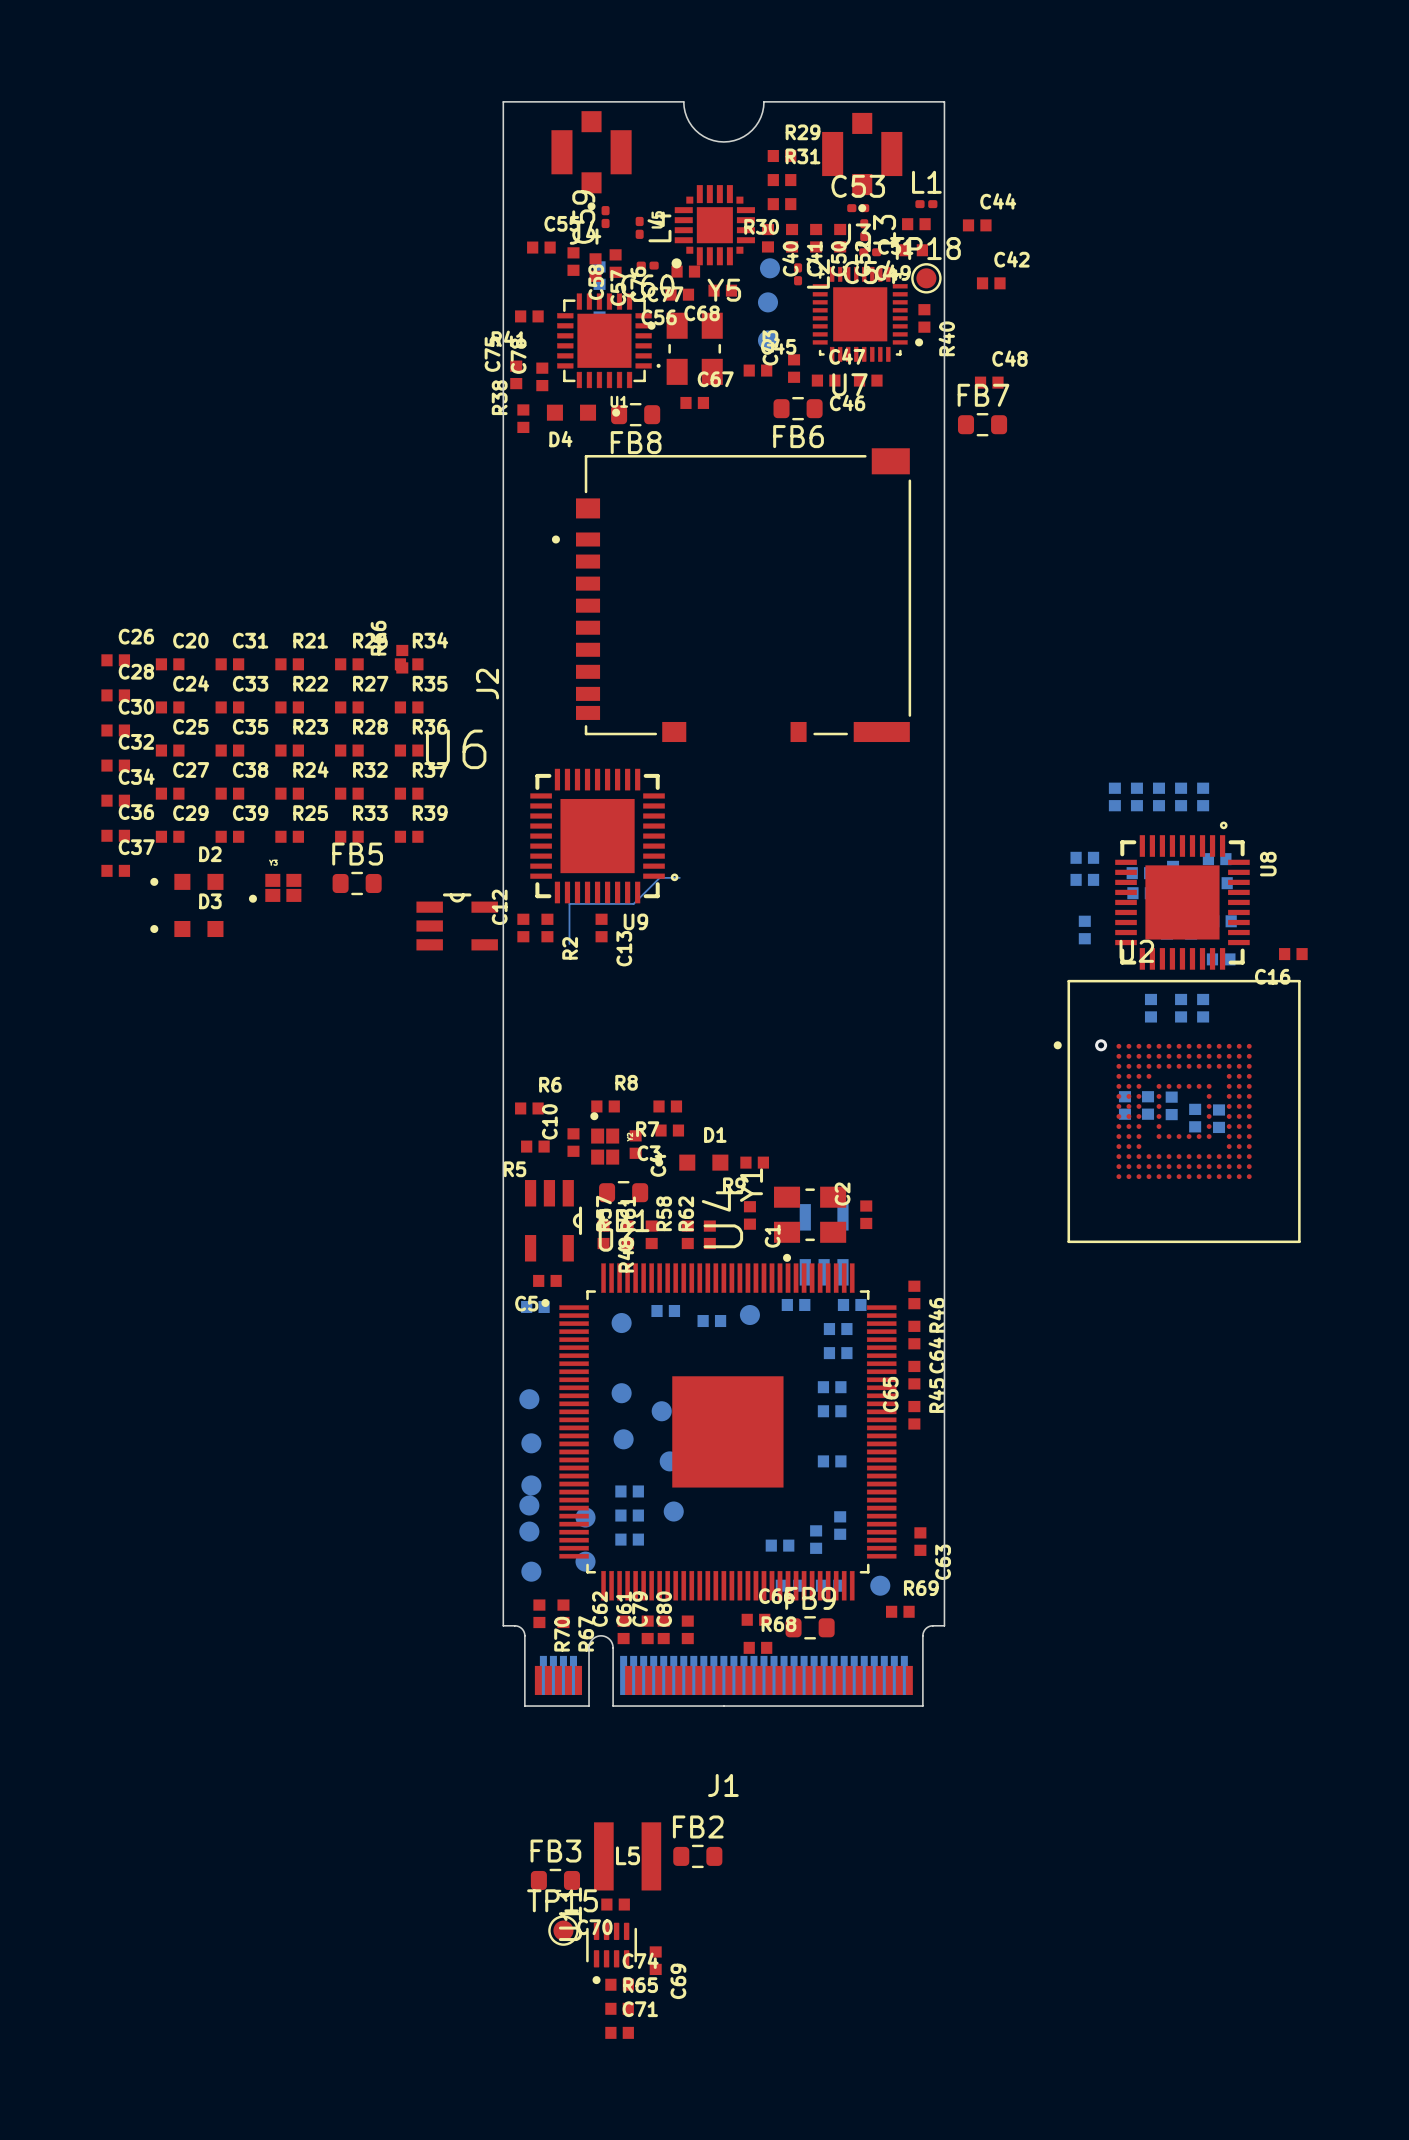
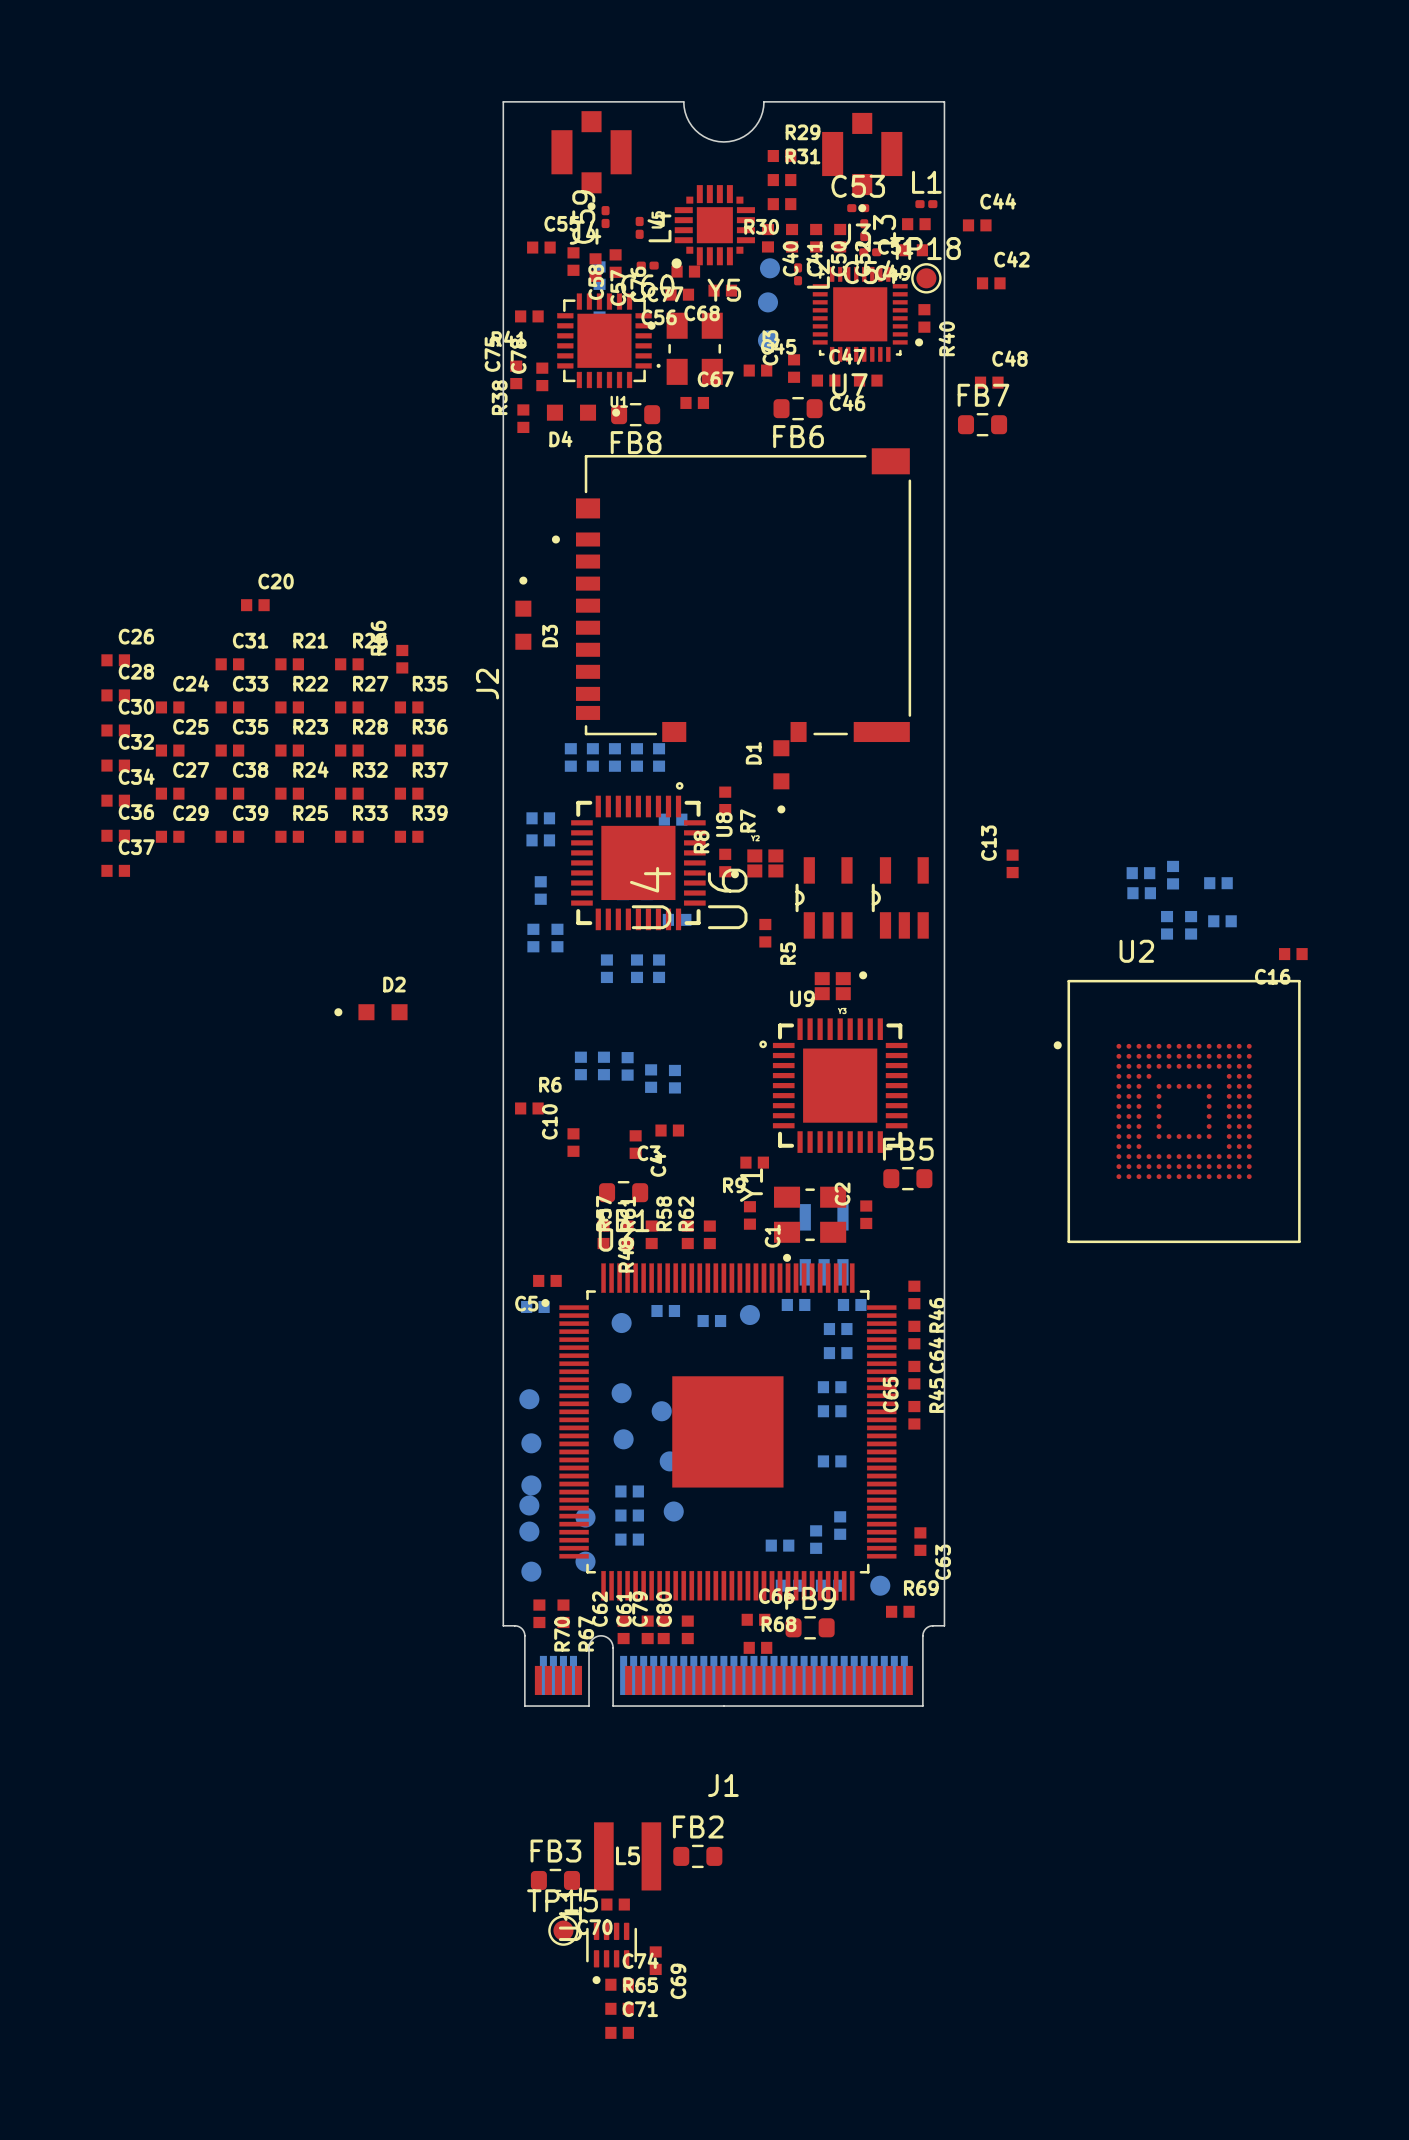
C20 position: (170, 664) -> (255, 605)
R34: (409, 664) -> none
part: none -> (570, 757)
part: none -> (592, 757)
part: none -> (614, 757)
part: none -> (637, 757)
part: none -> (659, 757)
part: (1114, 796) -> none
part: (1136, 796) -> none
part: (1159, 796) -> none
part: (1181, 796) -> none
part: (1203, 796) -> none
part: none -> (540, 818)
part: none -> (673, 819)
U9 rotation: 0° (604, 836) -> 180° (833, 1085)
U9 position: (604, 836) -> (833, 1085)
part: none -> (540, 840)
part: (1084, 857) -> none
part: (1217, 859) -> none
bottom track: (679, 877) (659, 877) (633, 903) (569, 903) (569, 944) -> none
part: (1084, 879) -> none
D2 position: (186, 881) -> (370, 1012)
FB5 position: (357, 883) -> (907, 1178)
part rotation: 0° (275, 888) -> 180° (840, 985)
part position: (275, 888) -> (840, 985)
part: none -> (540, 890)
U8 position: (1182, 895) -> (638, 856)
part: none -> (677, 919)
U6 rotation: 0° (457, 921) -> 90° counterclockwise (900, 897)
U6 position: (457, 921) -> (900, 897)
C12 side: top (523, 928) -> bottom (557, 938)
R2 side: top (547, 928) -> bottom (533, 938)
C13 position: (601, 928) -> (1012, 863)
D3 rotation: 0° (186, 929) -> 90° clockwise (523, 613)
D3 position: (186, 929) -> (523, 613)
part: (1084, 930) -> none
C13 name position: C13 (624, 948) -> C13 (988, 843)
part: (1221, 959) -> none
part: none -> (606, 968)
part: none -> (637, 968)
part: none -> (659, 968)
part: (1150, 1008) -> none
part: (1181, 1008) -> none
part: (1203, 1008) -> none
via: (1101, 1045) -> none
part: none -> (580, 1065)
part: none -> (603, 1065)
part: none -> (627, 1066)
part: none -> (651, 1078)
part: none -> (674, 1079)
R8 name position: R8 (626, 1082) -> R8 (701, 842)
part: (1124, 1105) -> none
part: (1148, 1105) -> none
part: (1171, 1105) -> none
R8 rotation: 0° (605, 1106) -> 90° clockwise (725, 863)
R8 position: (605, 1106) -> (725, 863)
R7 rotation: 0° (667, 1106) -> 90° clockwise (725, 800)
R7 position: (667, 1106) -> (725, 800)
part: (1195, 1118) -> none
part: (1219, 1118) -> none
R7 name position: R7 (647, 1129) -> R7 (747, 820)
part rotation: 0° (604, 1138) -> 90° counterclockwise (757, 863)
part position: (604, 1138) -> (757, 863)
R5 rotation: 0° (535, 1146) -> 90° clockwise (765, 933)
R5 position: (535, 1146) -> (765, 933)
D1 rotation: 0° (691, 1162) -> 90° counterclockwise (781, 776)
D1 position: (691, 1162) -> (781, 776)
R5 name position: R5 (515, 1169) -> R5 (788, 953)
U4 rotation: 0° (553, 1220) -> 180° (824, 897)
U4 position: (553, 1220) -> (824, 897)

